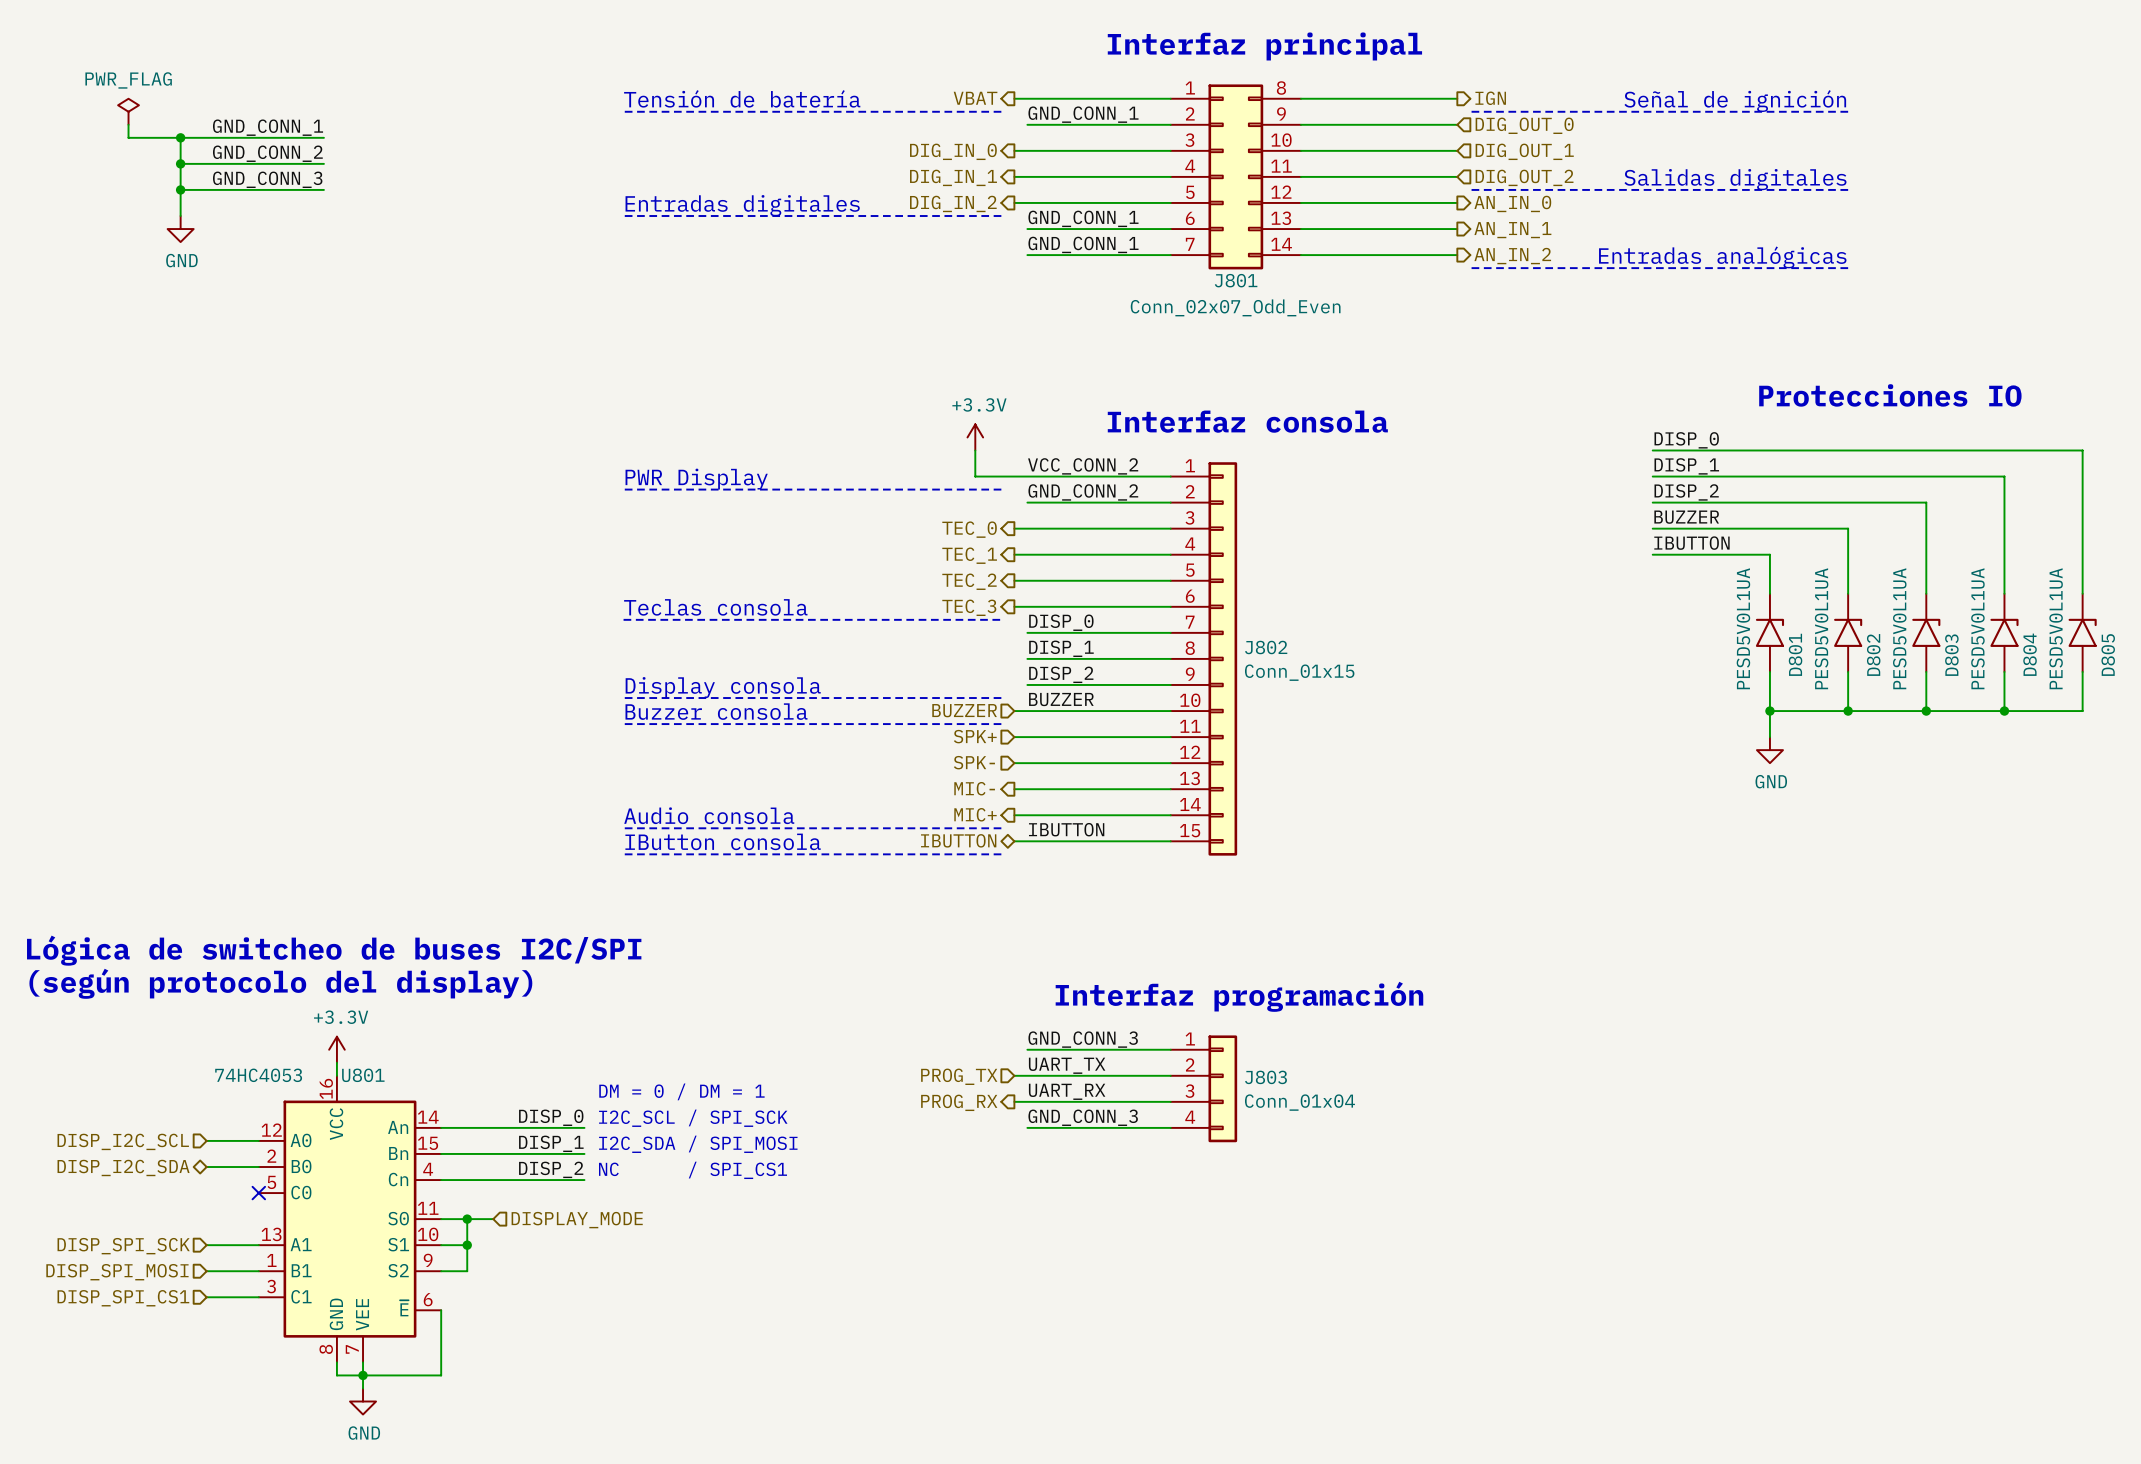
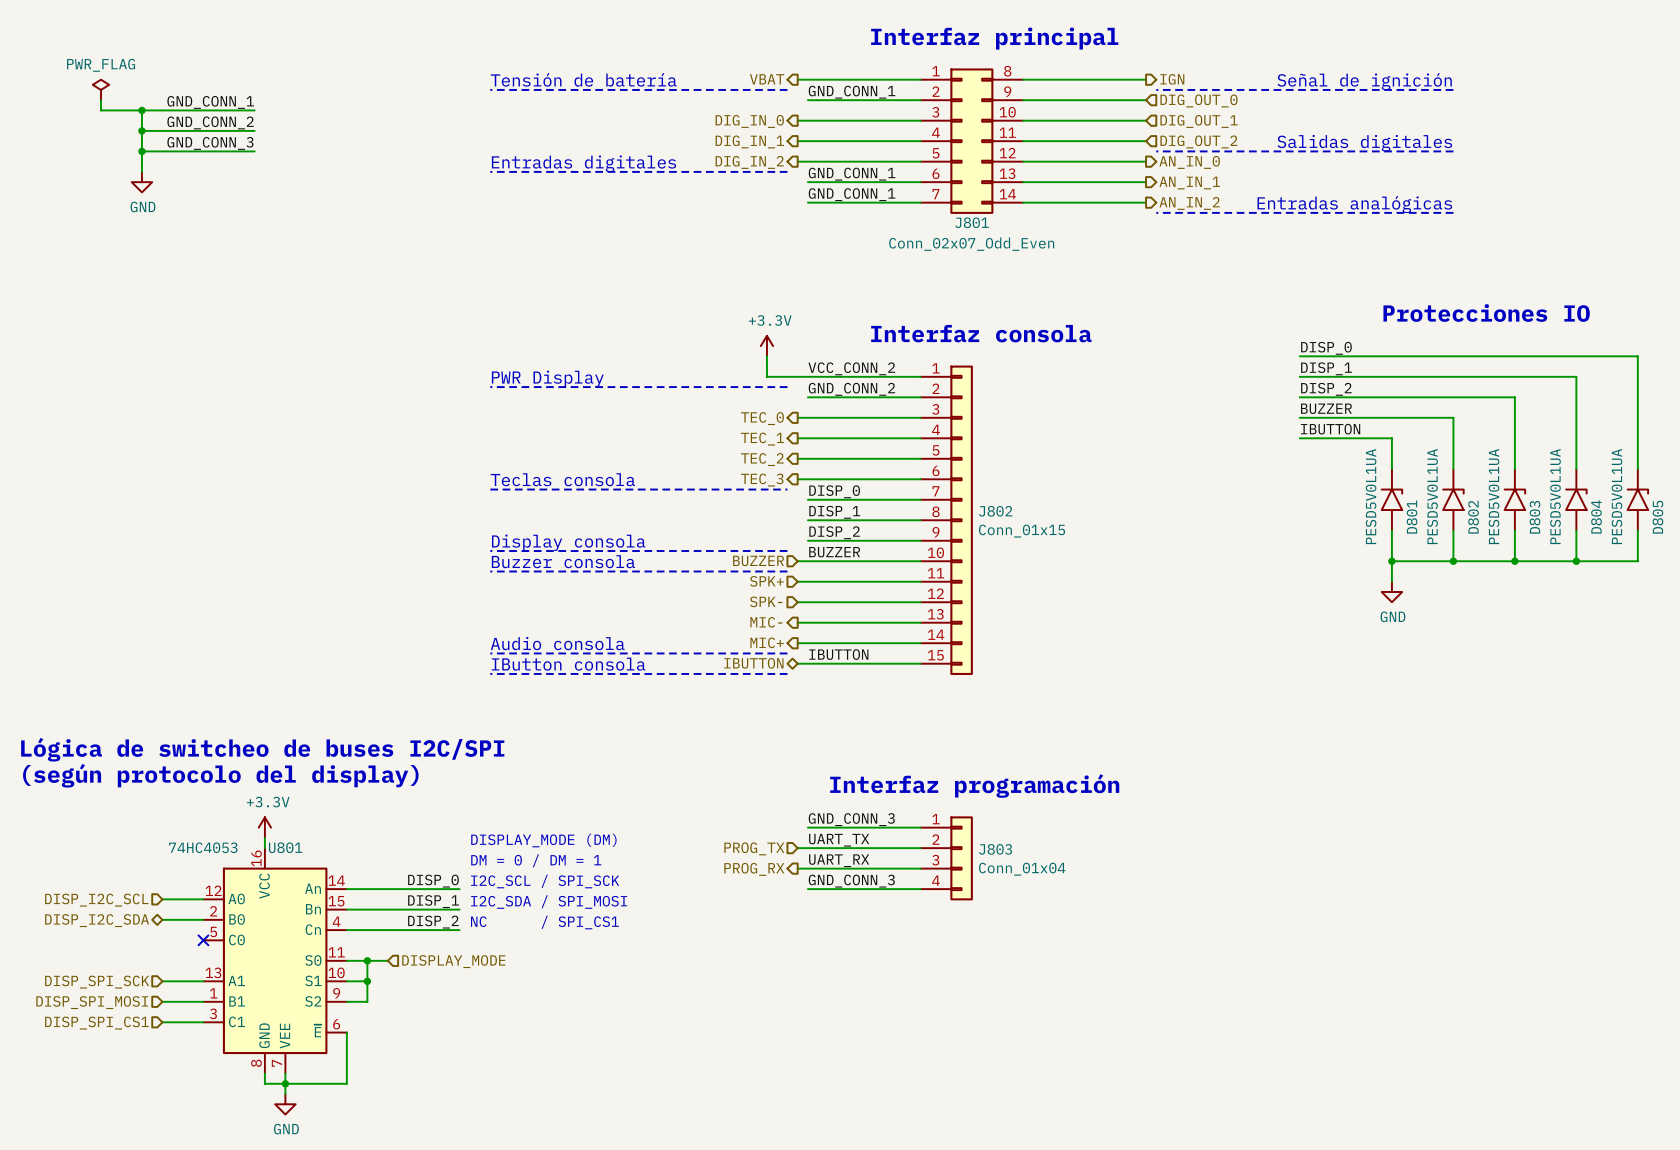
text: none -> DISPLAY_MODE (DM) (543, 840)

